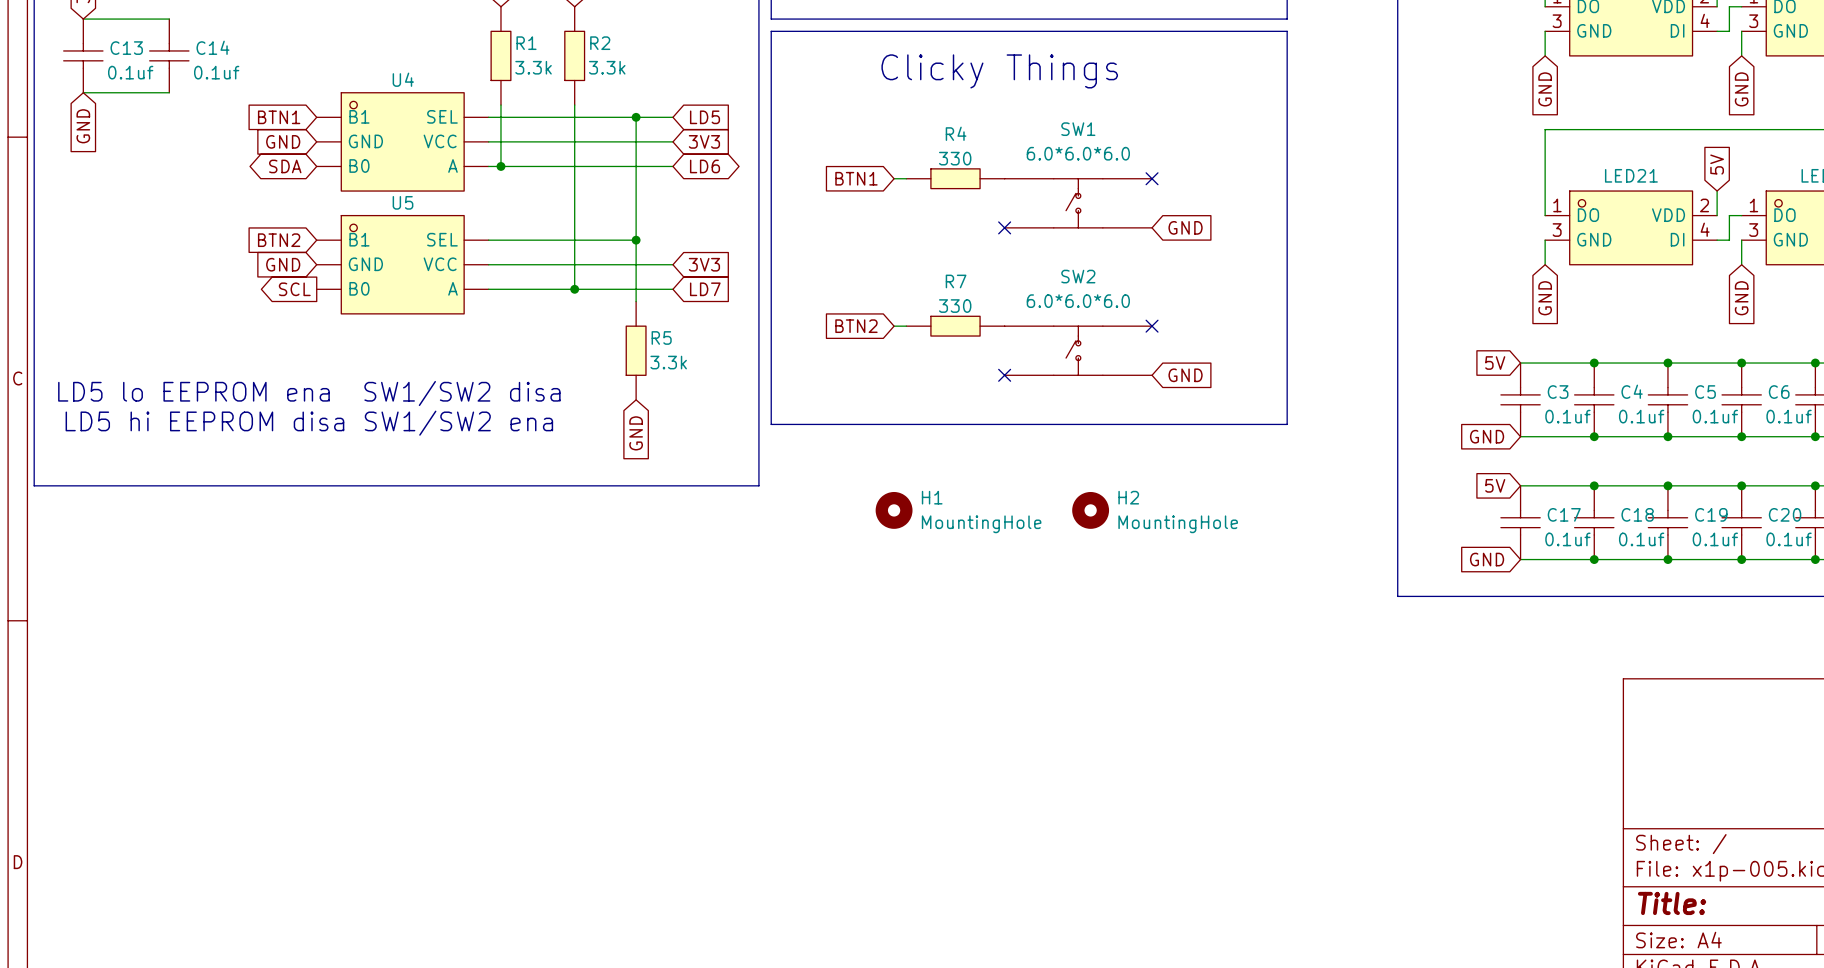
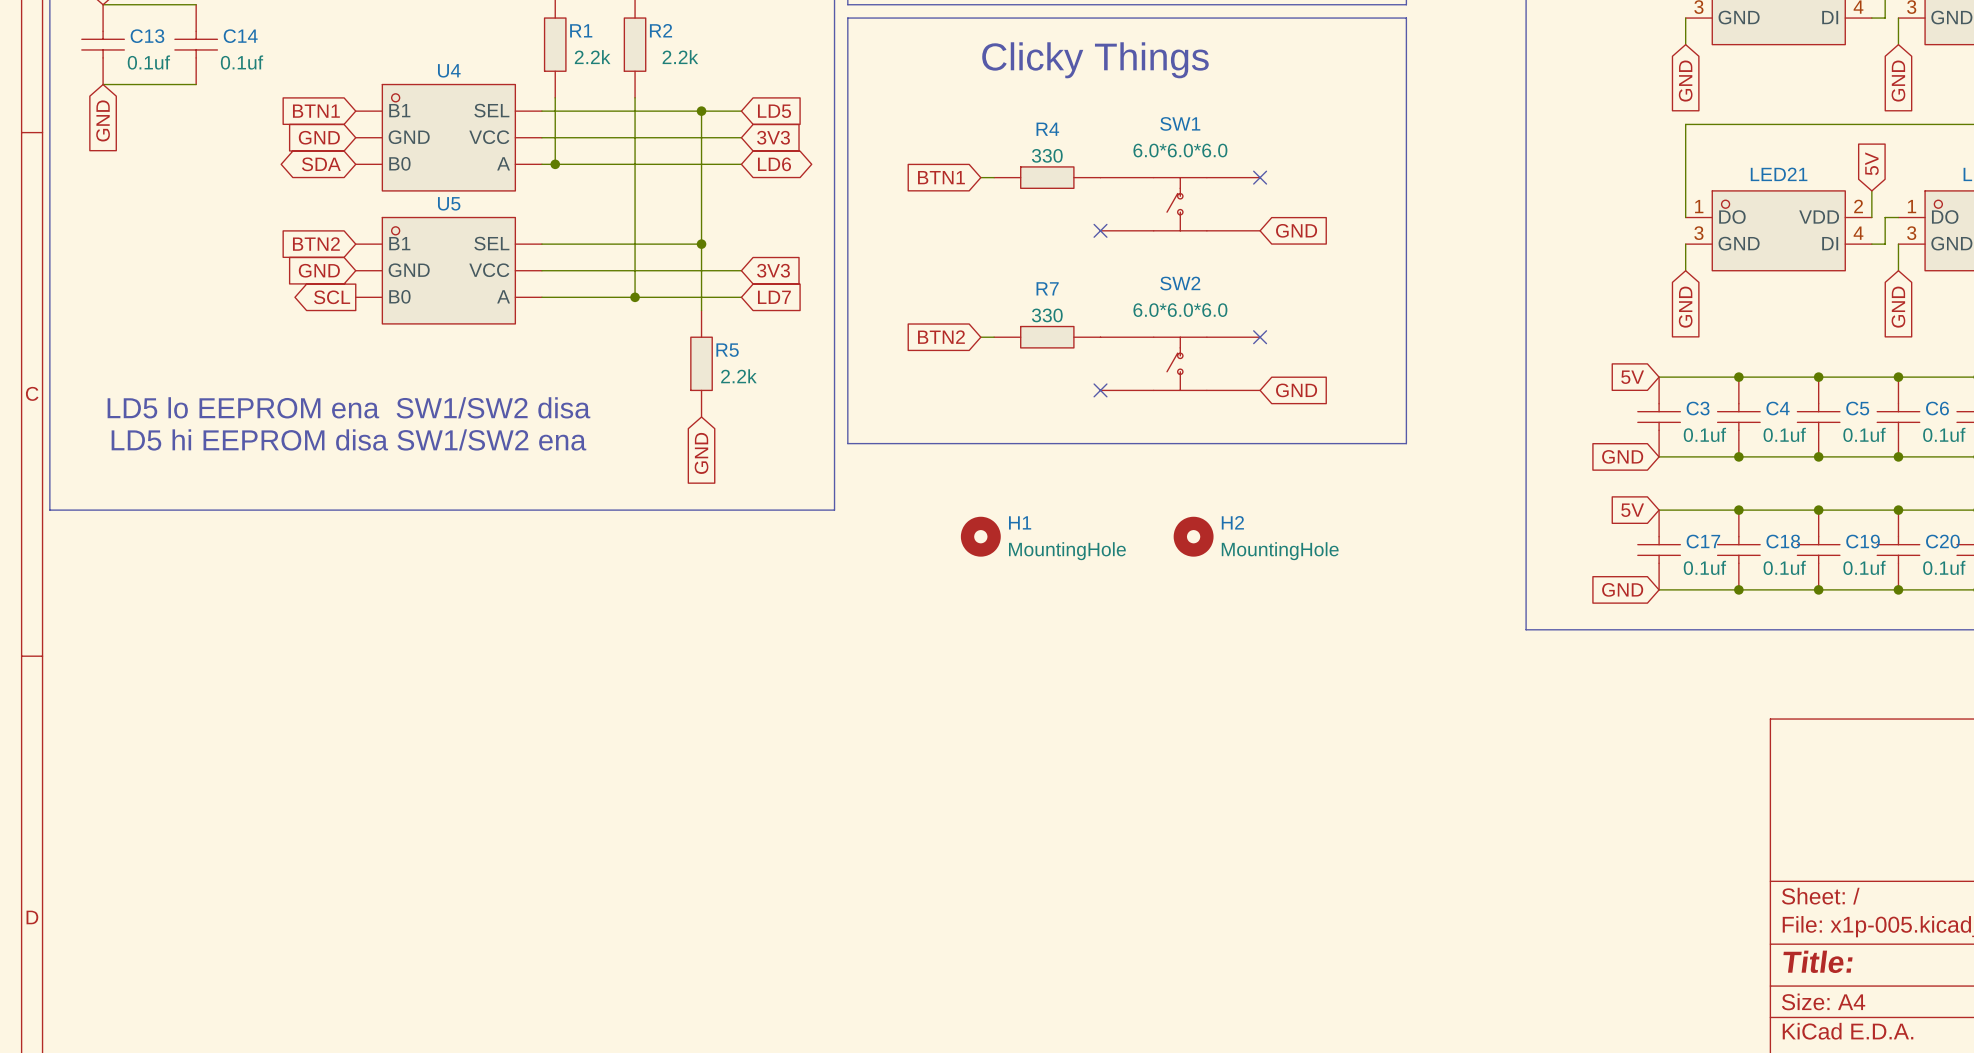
R1 value: 3.3k (533, 67) -> 2.2k (592, 57)
R2 value: 3.3k (607, 67) -> 2.2k (680, 57)
R5 value: 3.3k (668, 362) -> 2.2k (738, 376)

